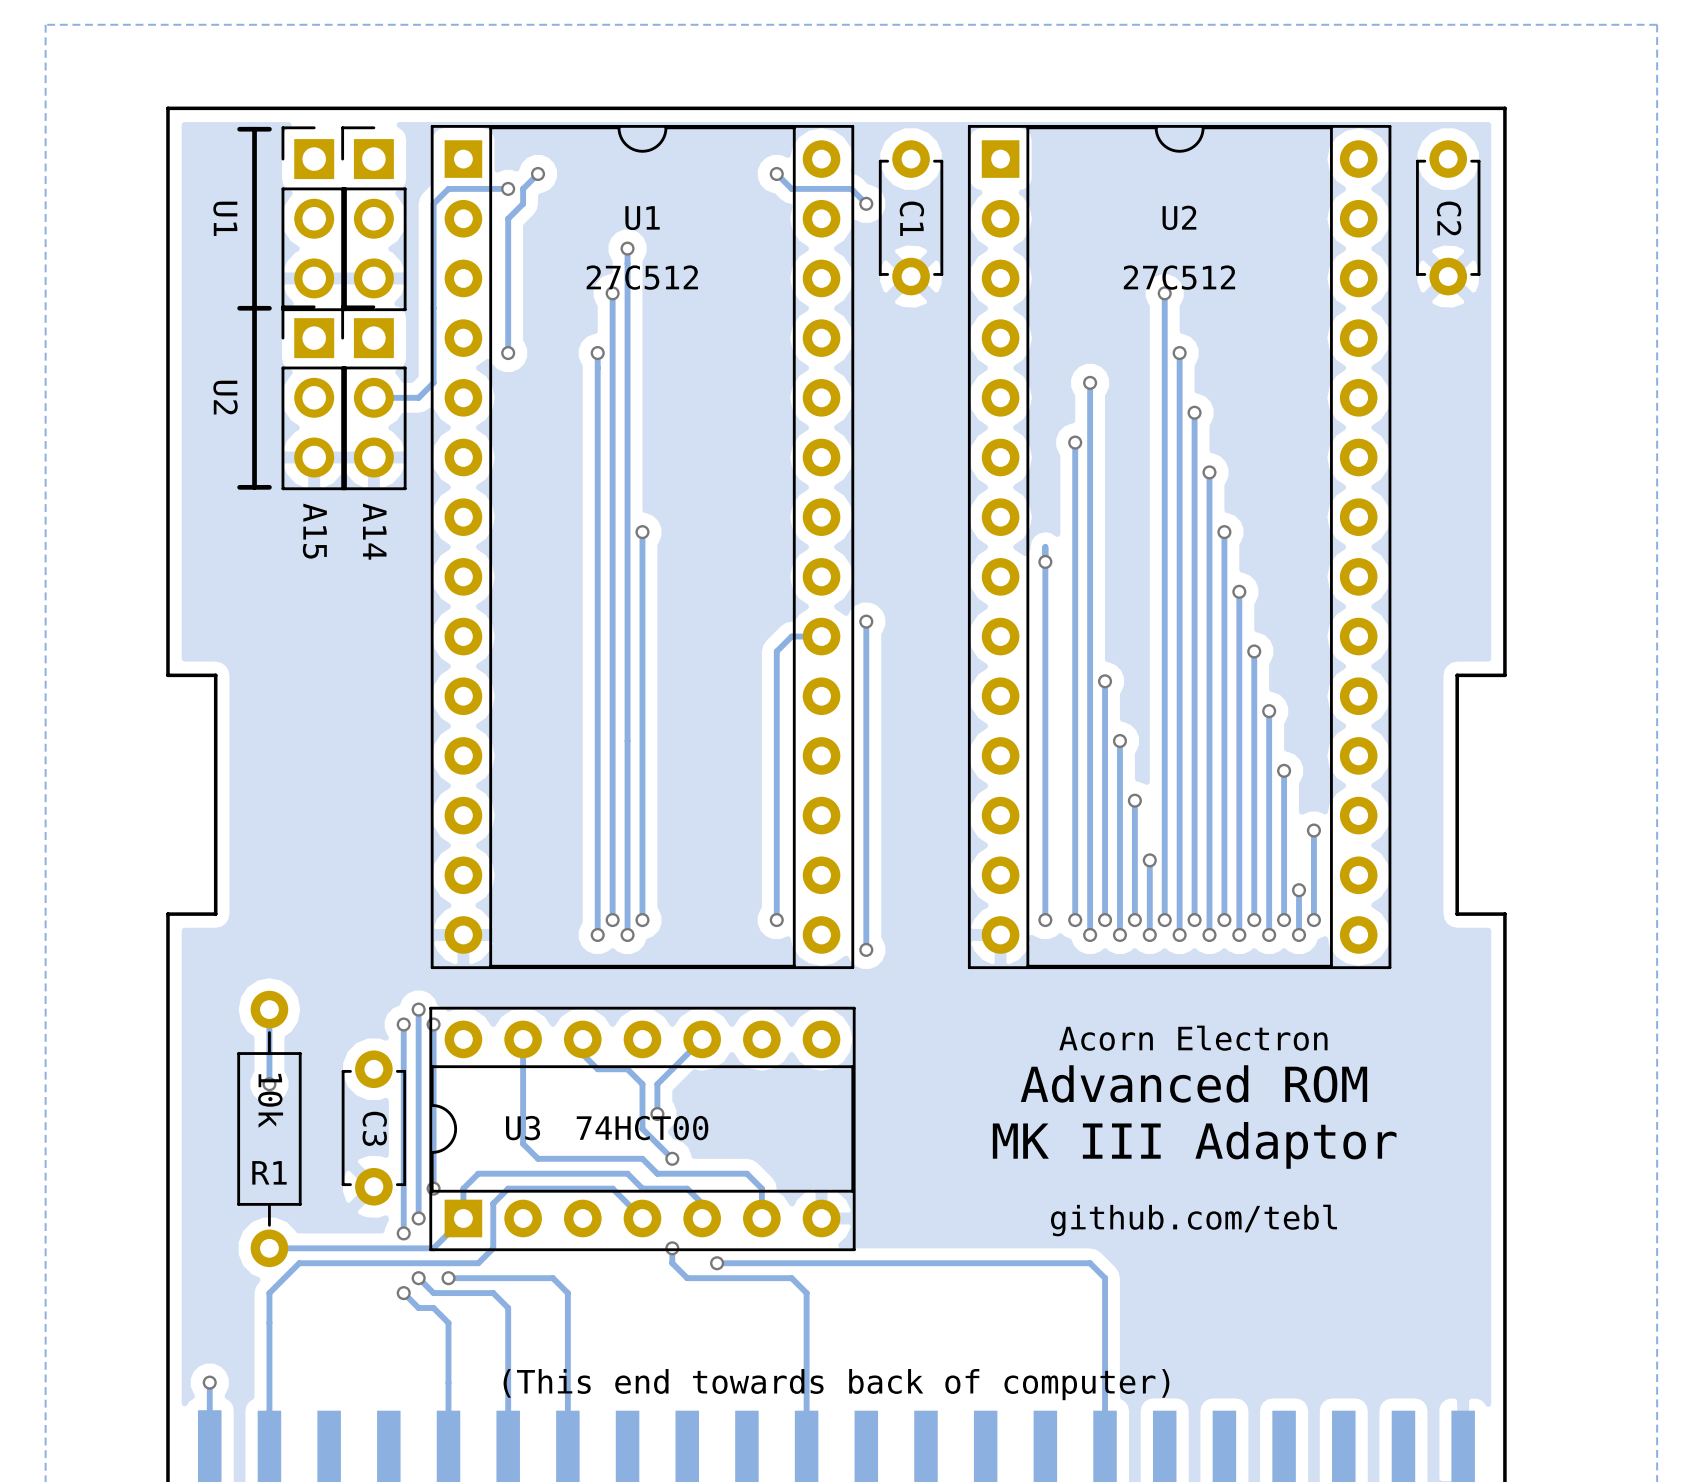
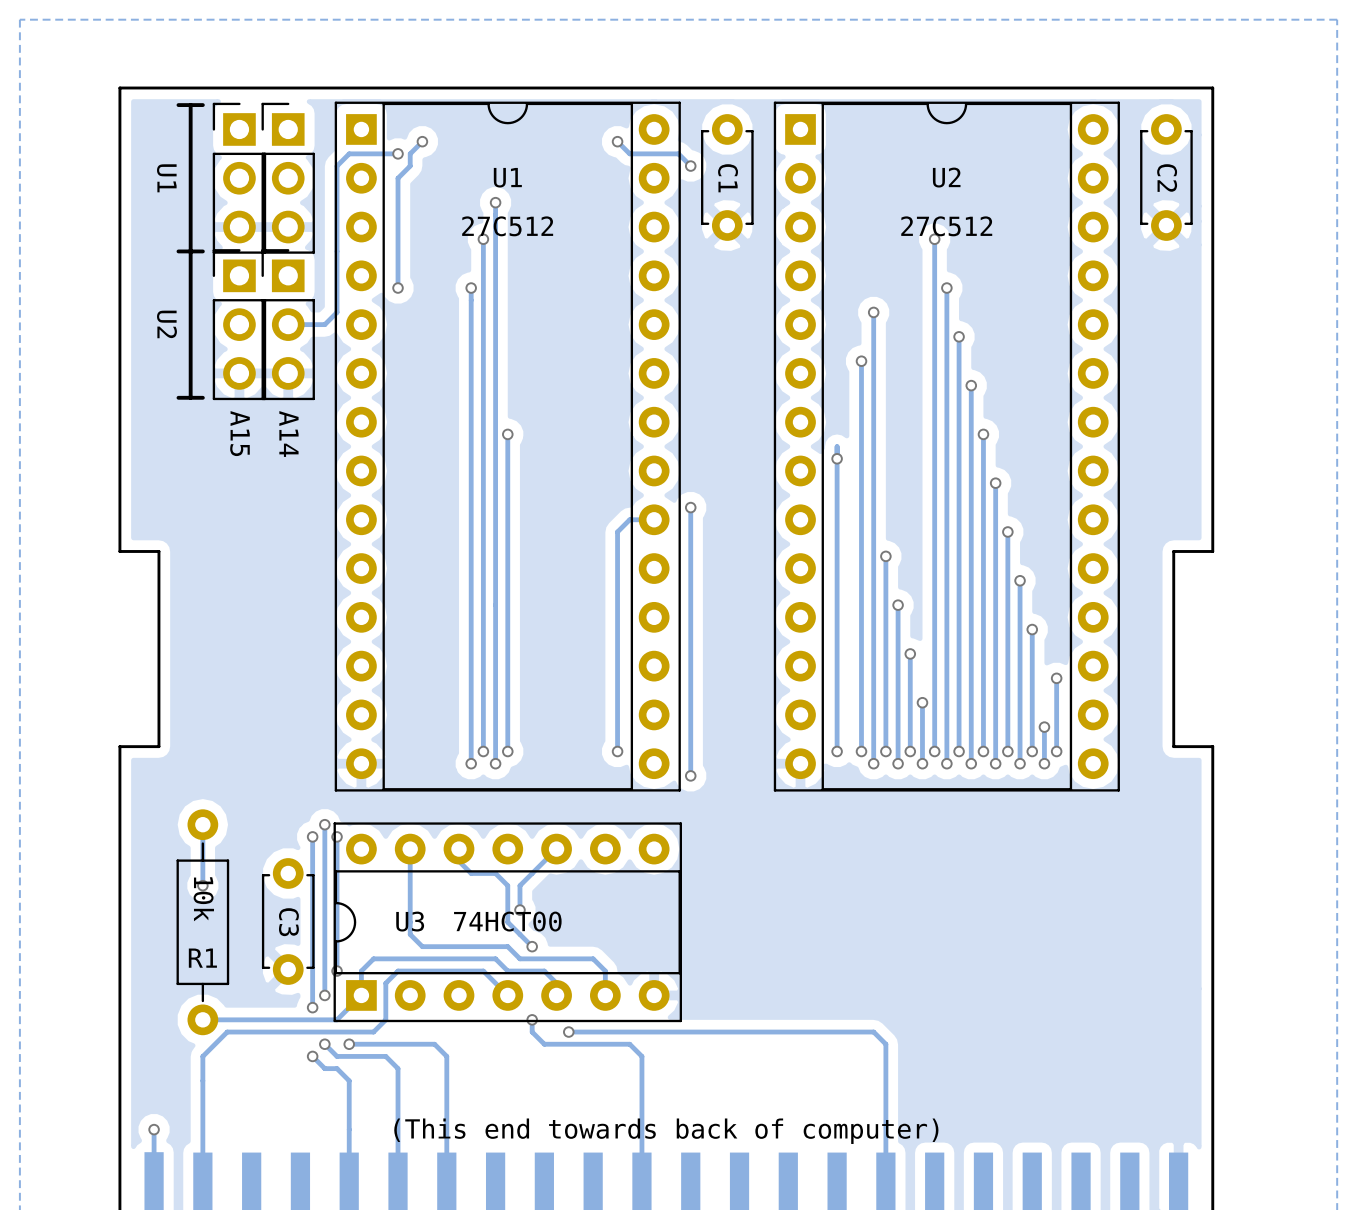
text: Acorn Electron (1193, 1038) -> none
text: Advanced ROM (1193, 1083) -> none
text: MK III Adaptor (1194, 1145) -> none
text: github.com/tebl (1193, 1220) -> none

